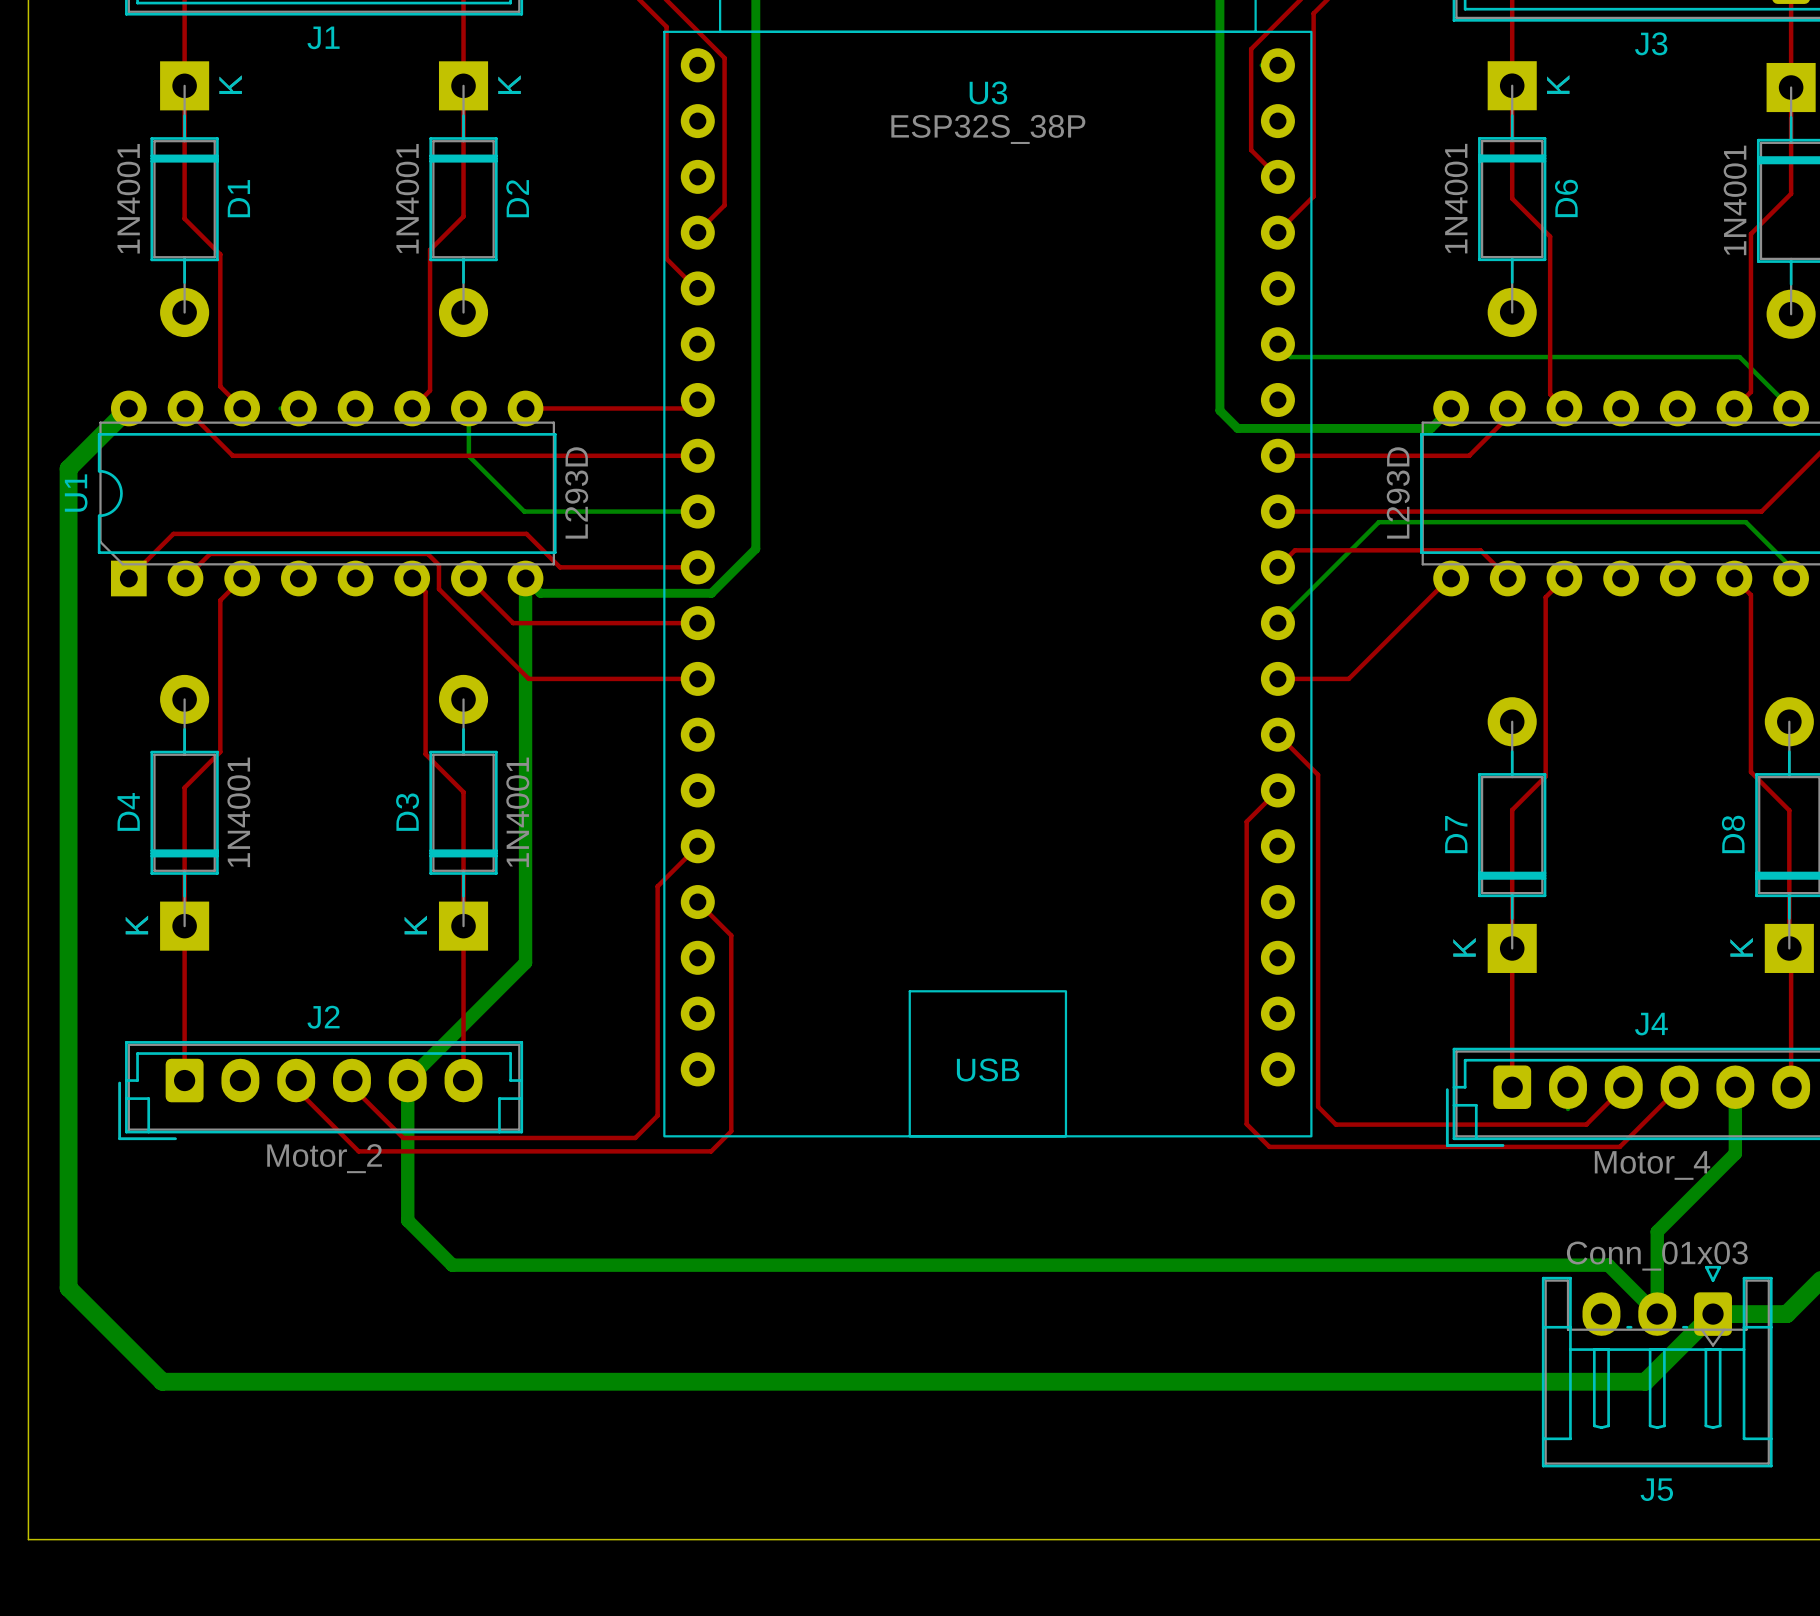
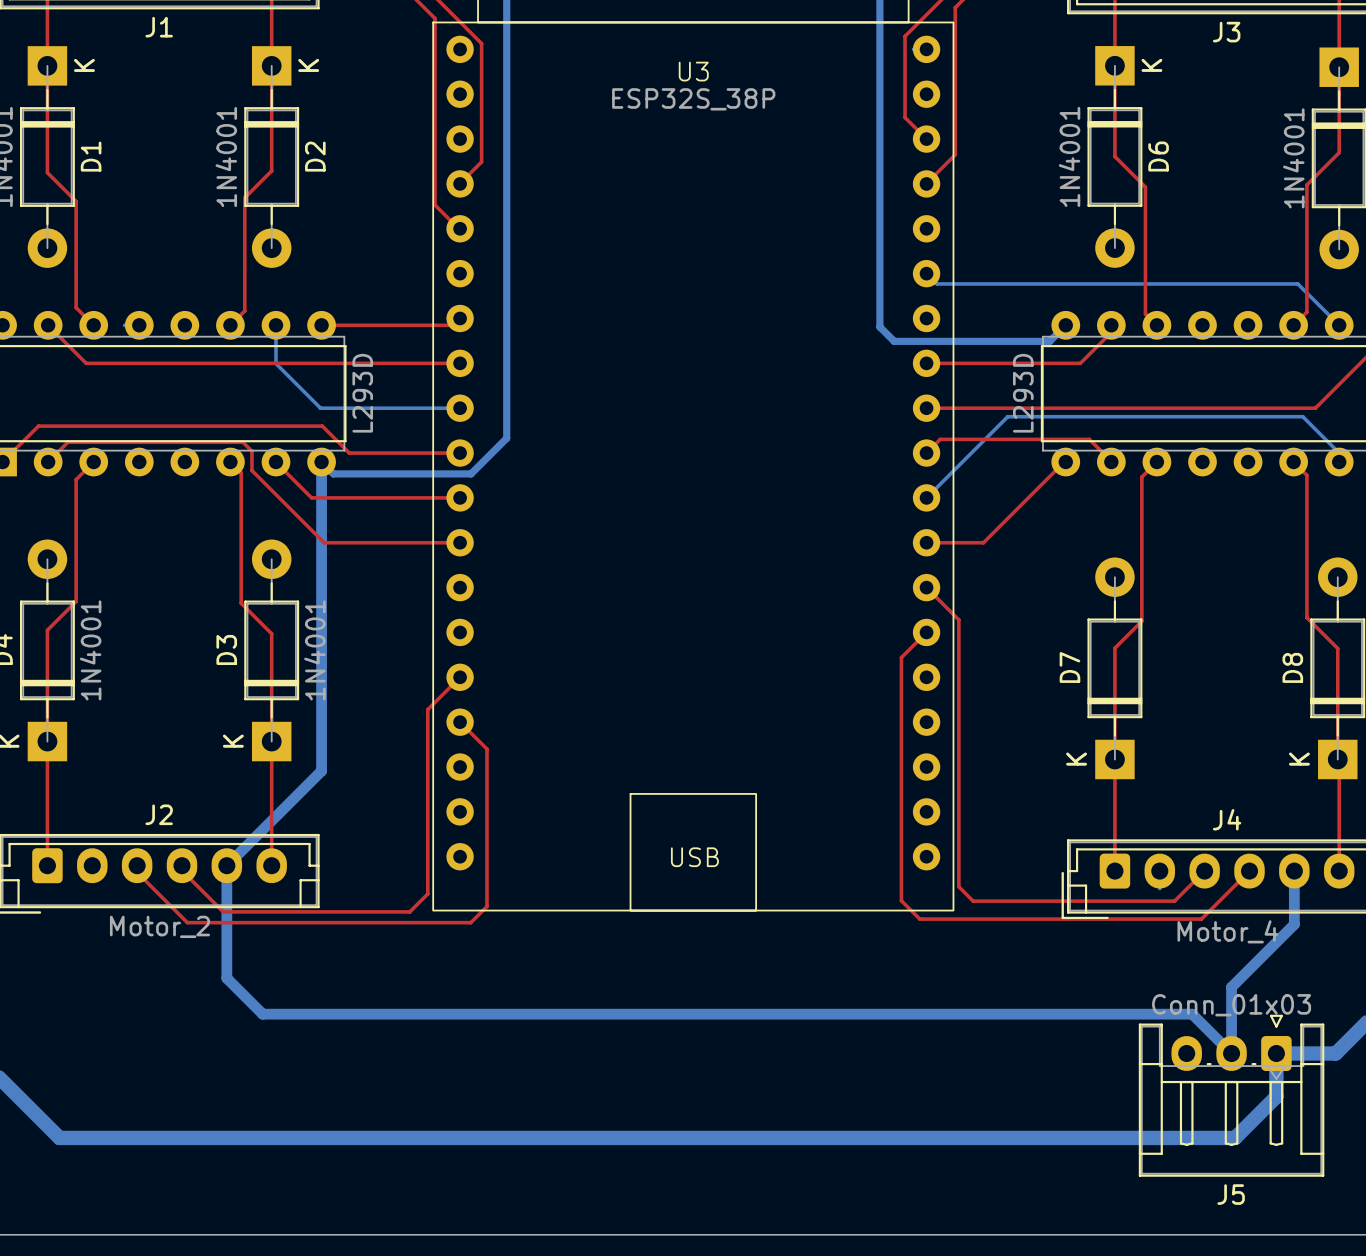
bottom track: (1713, 1314) (1645, 1381) (162, 1381) -> (1276, 1053) (1276, 1096) (1235, 1137) (59, 1137) (29, 1107)

